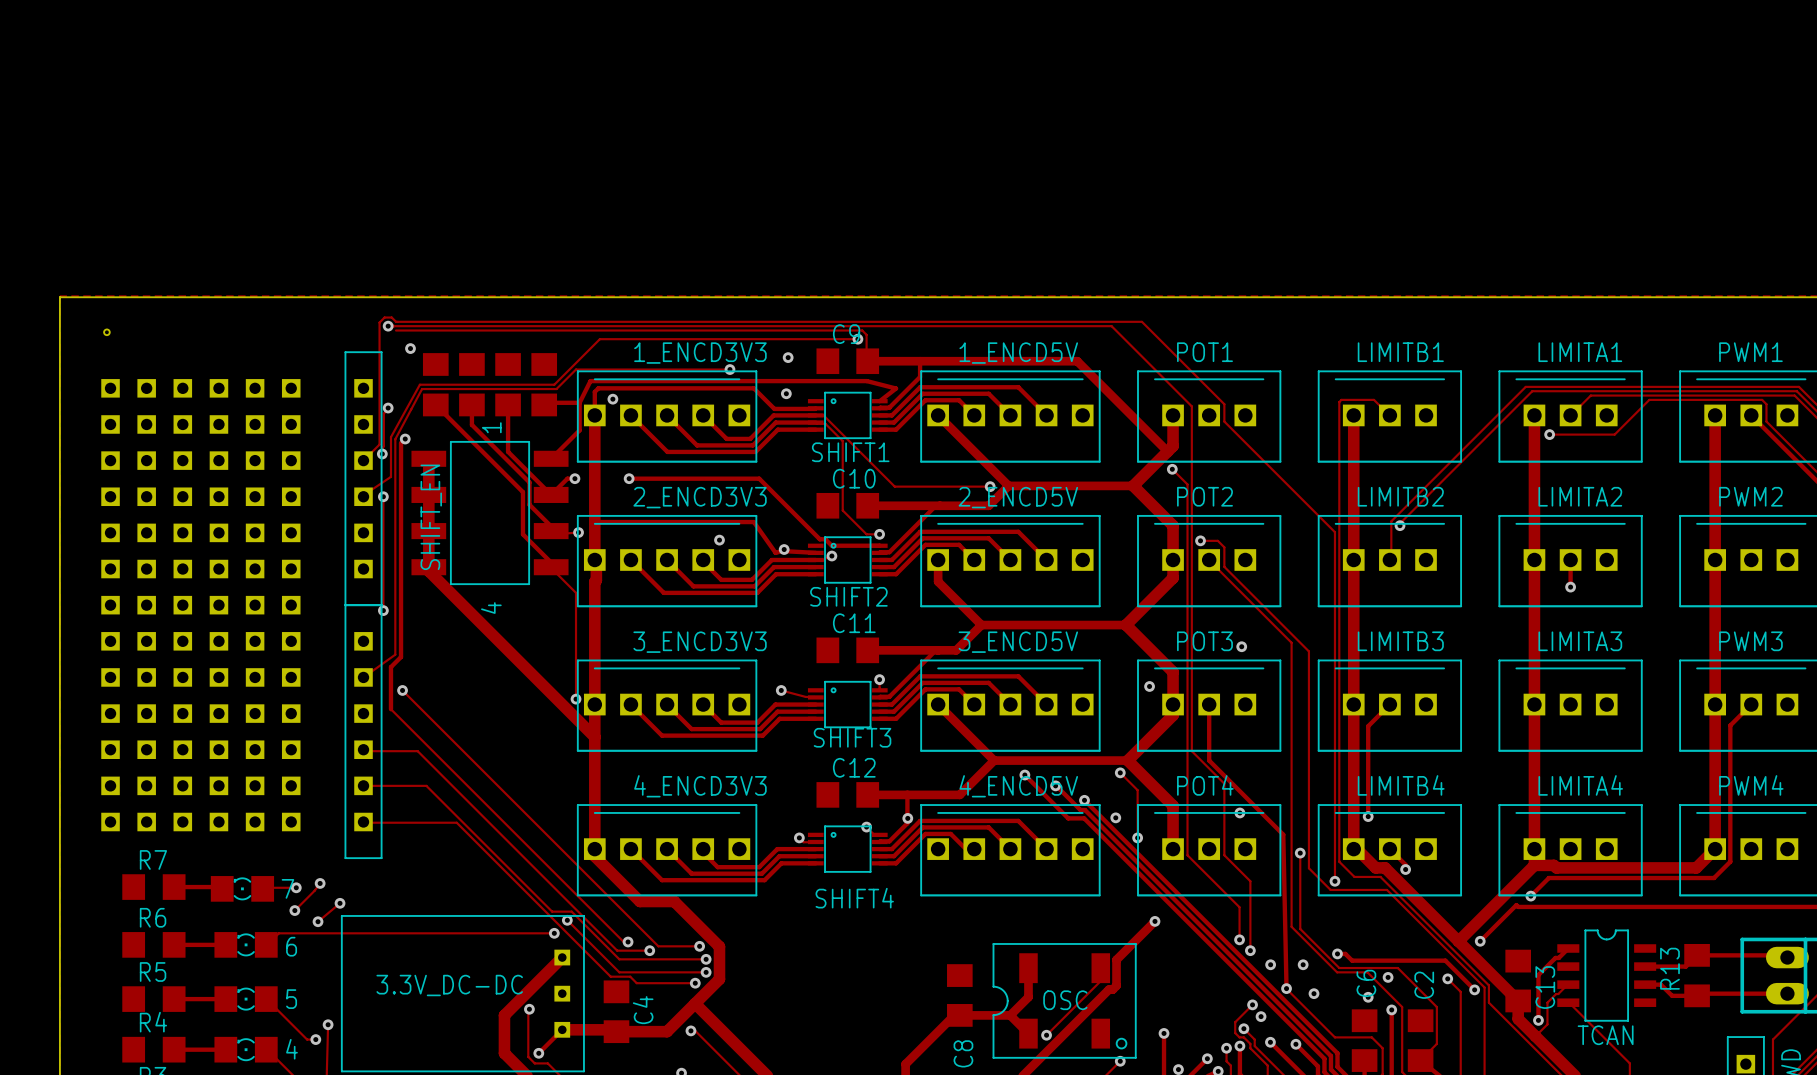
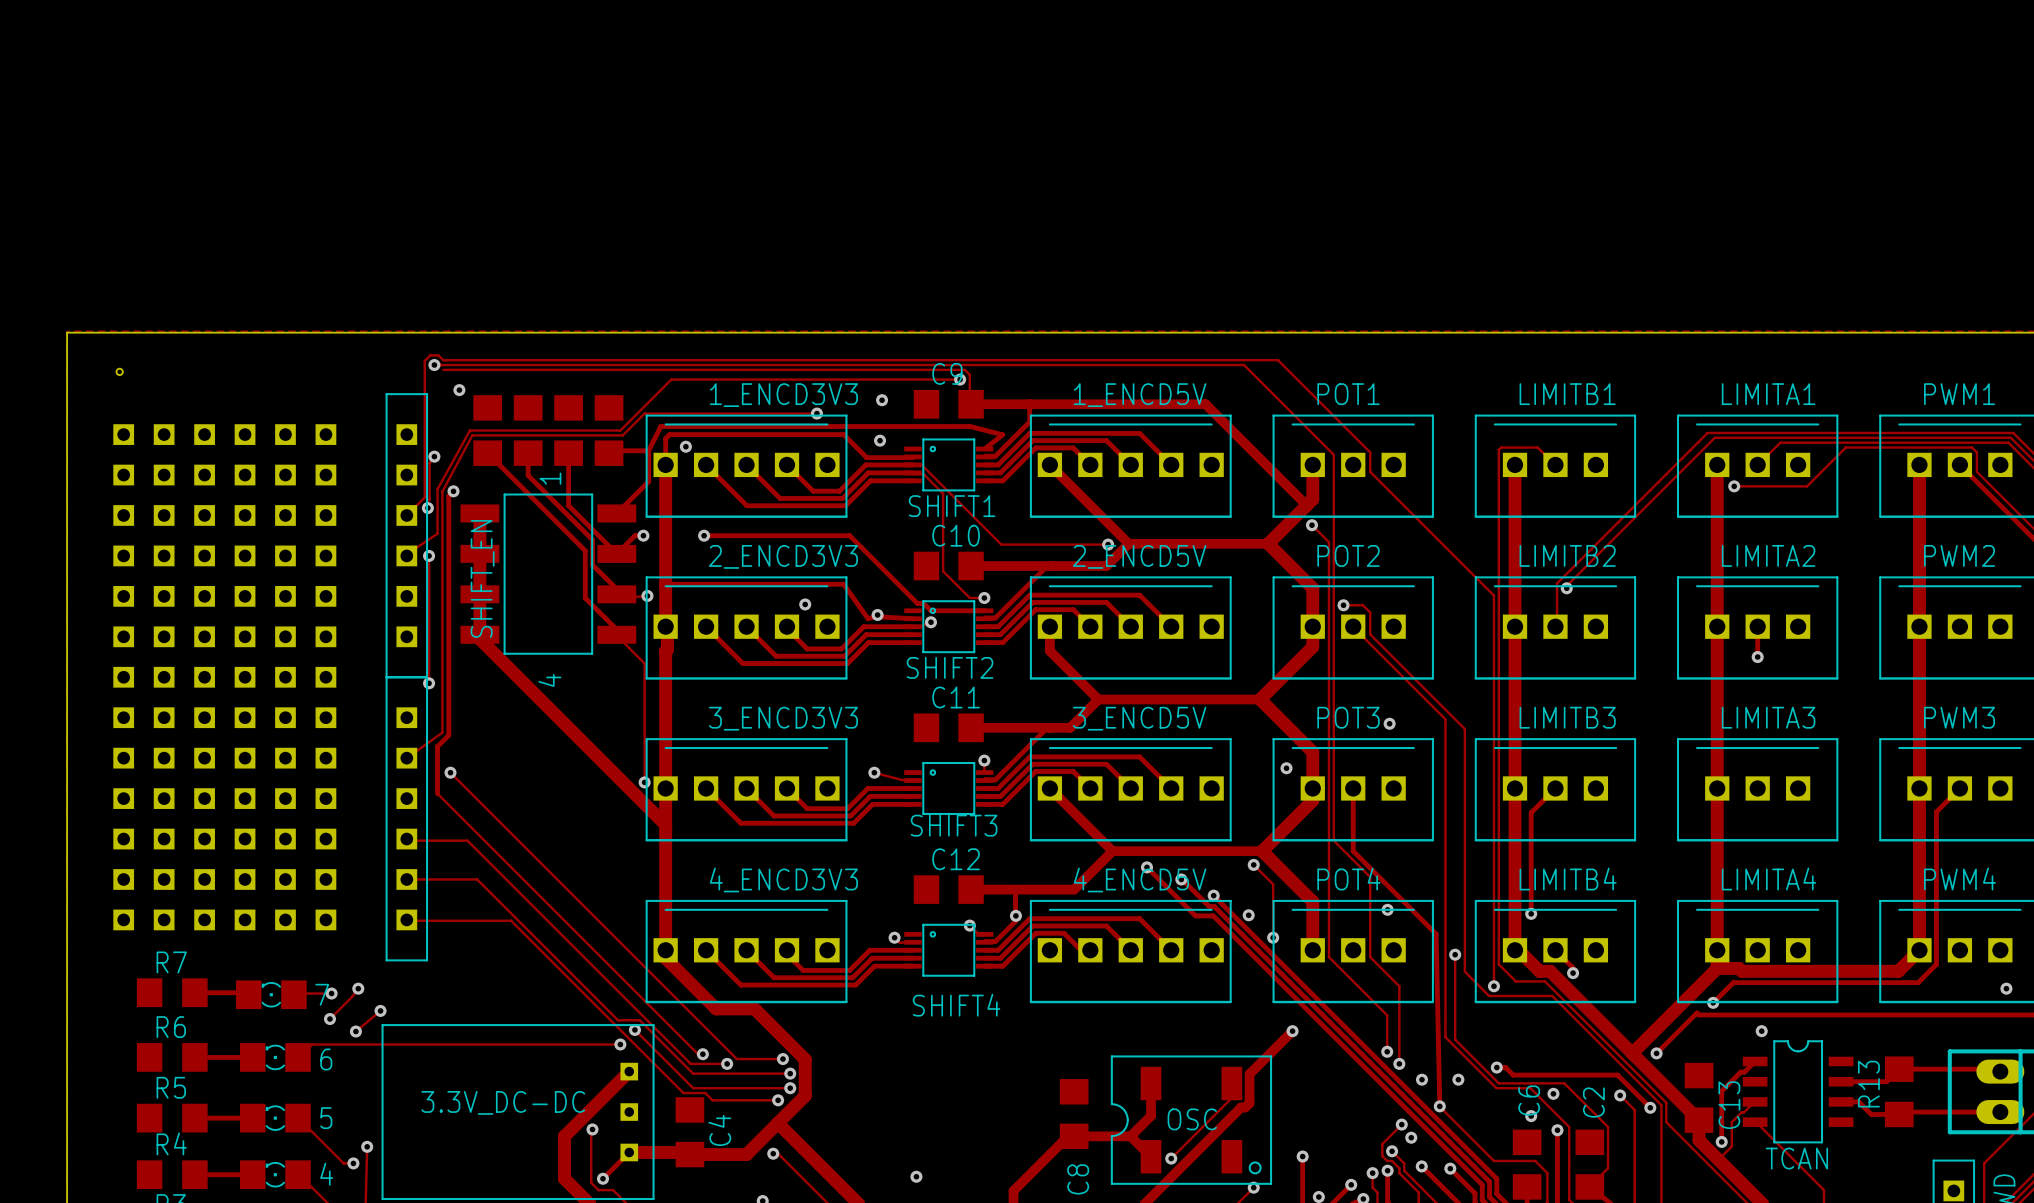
via: none -> (2006, 988)
via: none -> (1761, 1031)
via: (1313, 993) -> none
via: none -> (916, 1176)

